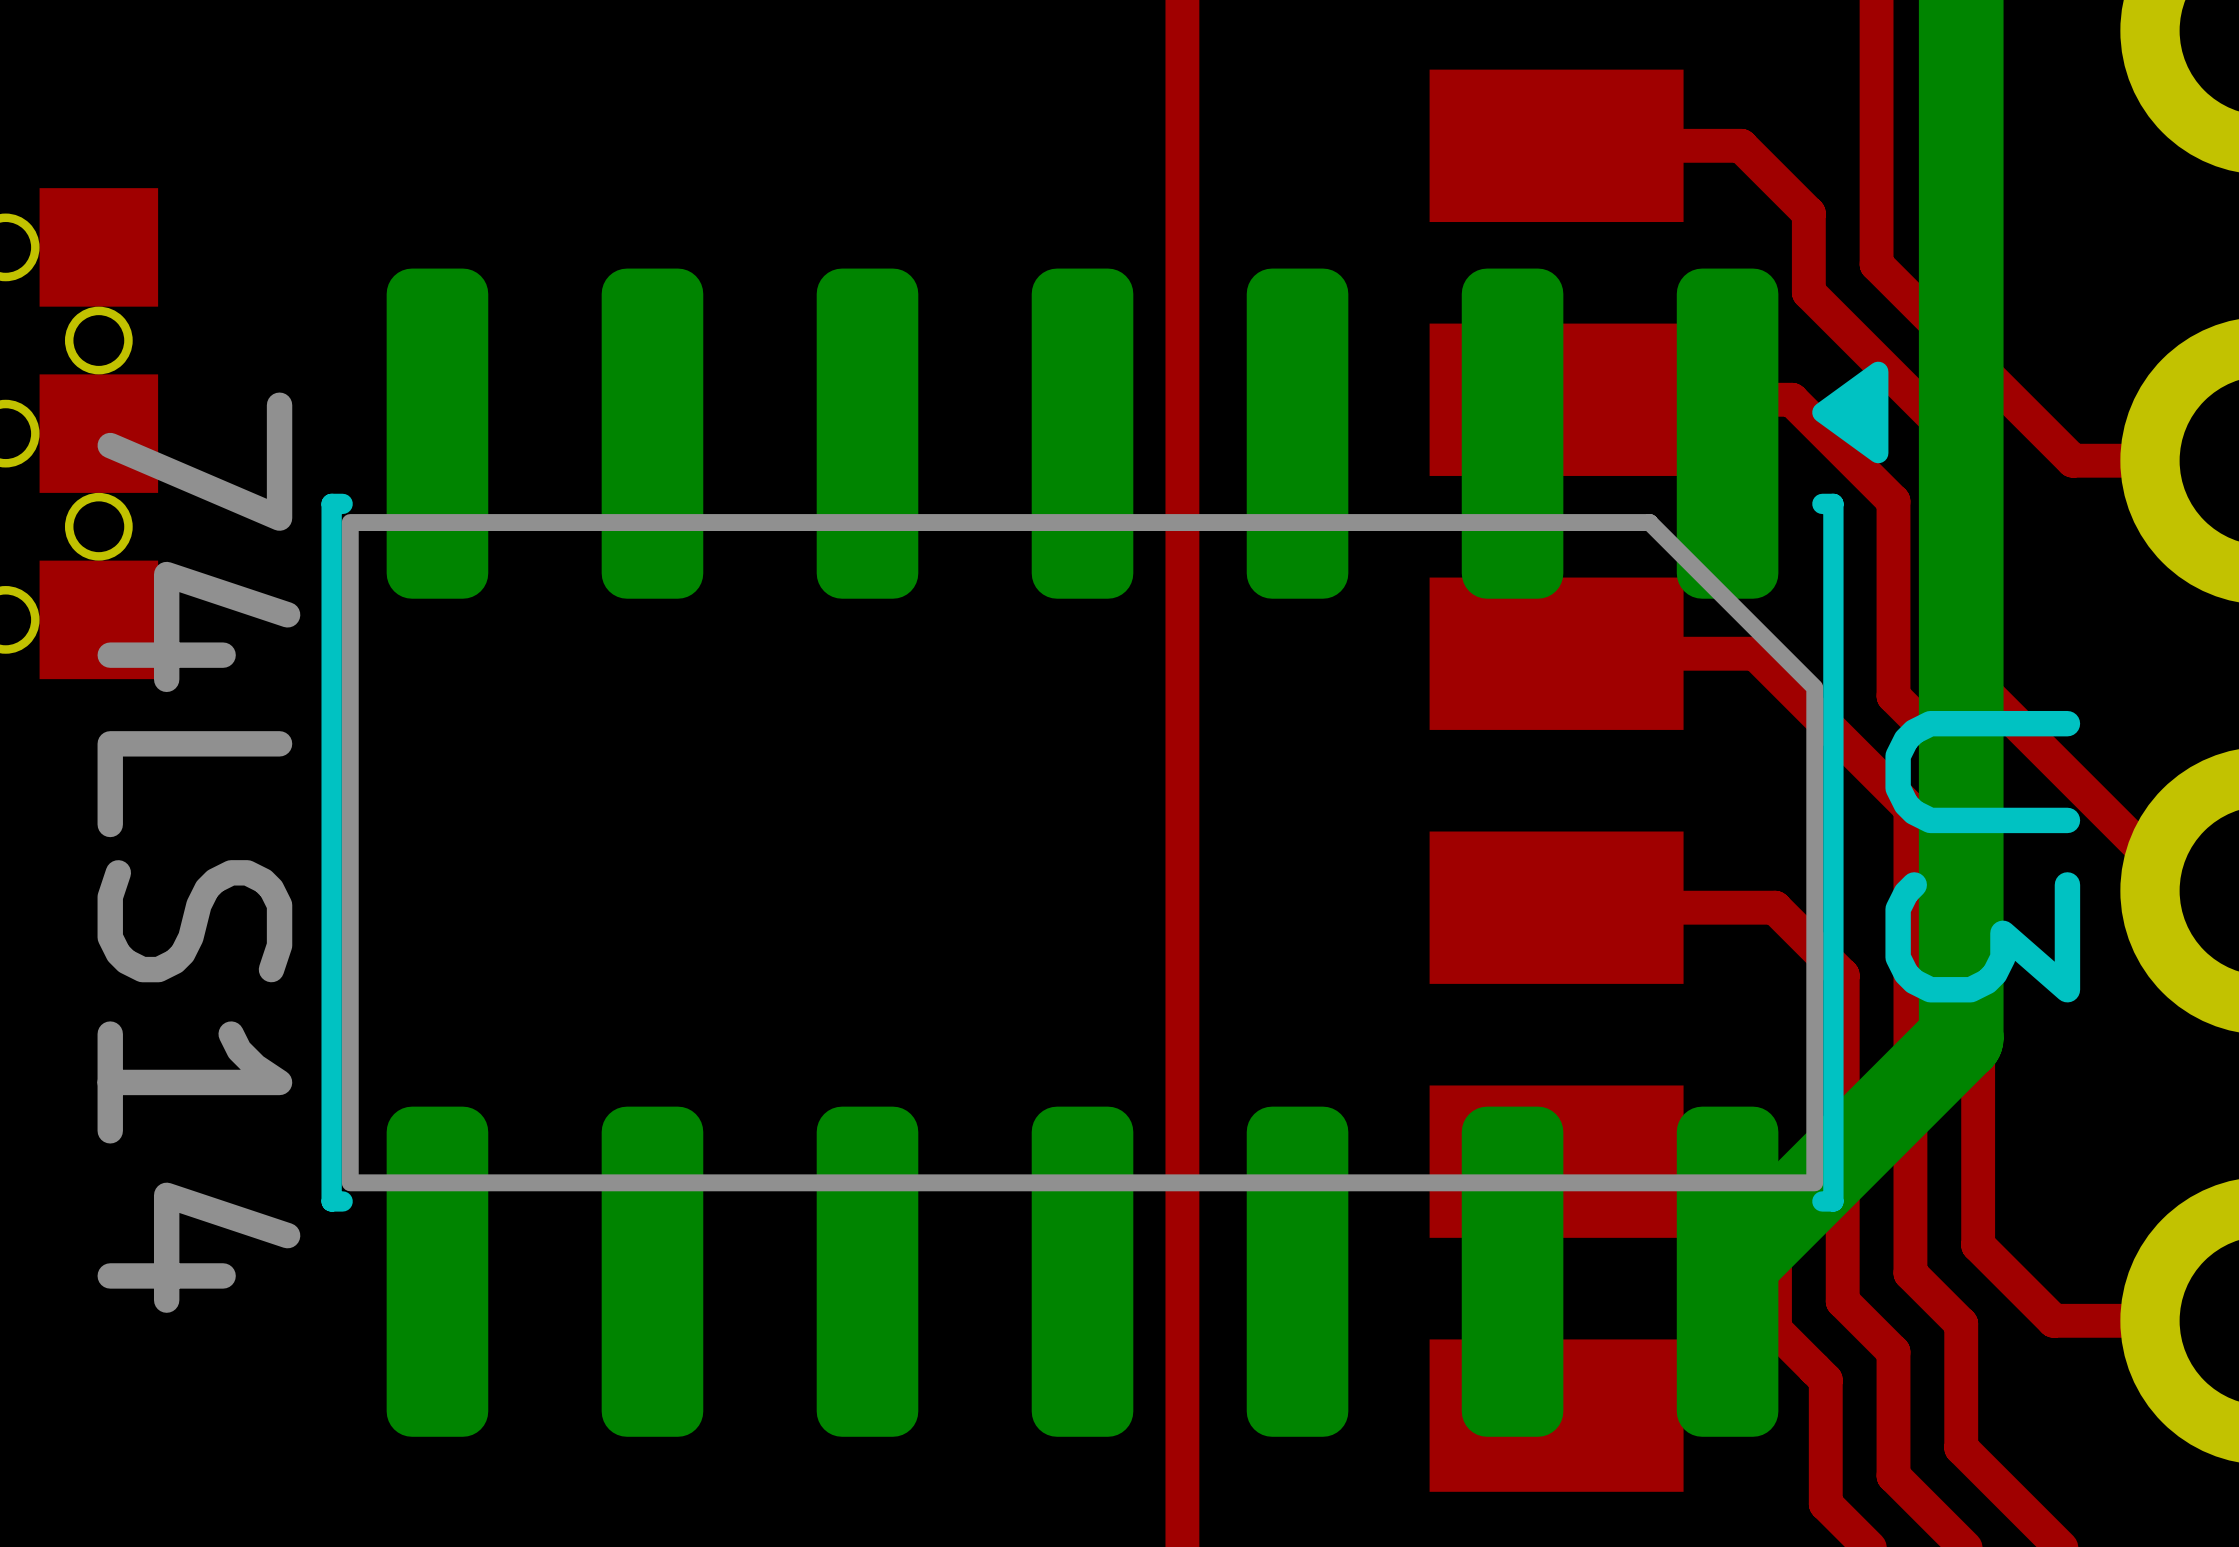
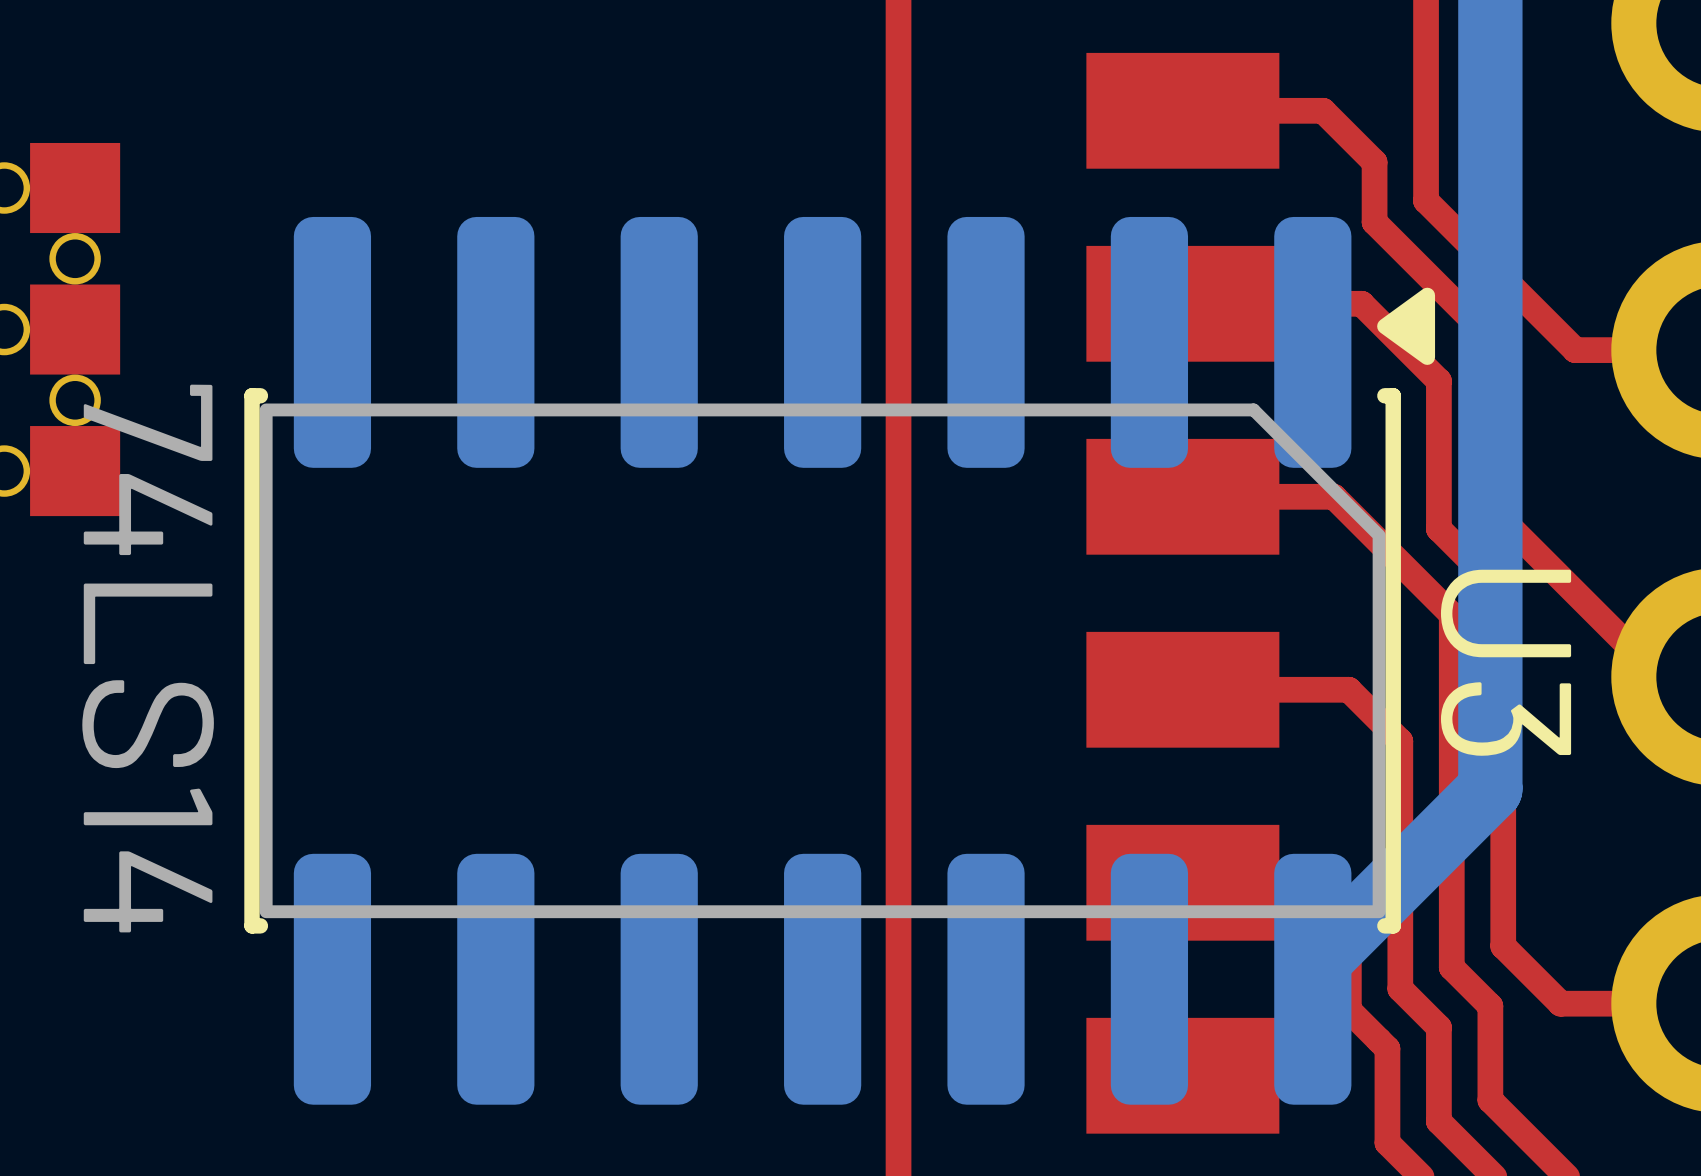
U3 position: (1104, 852) -> (839, 660)

